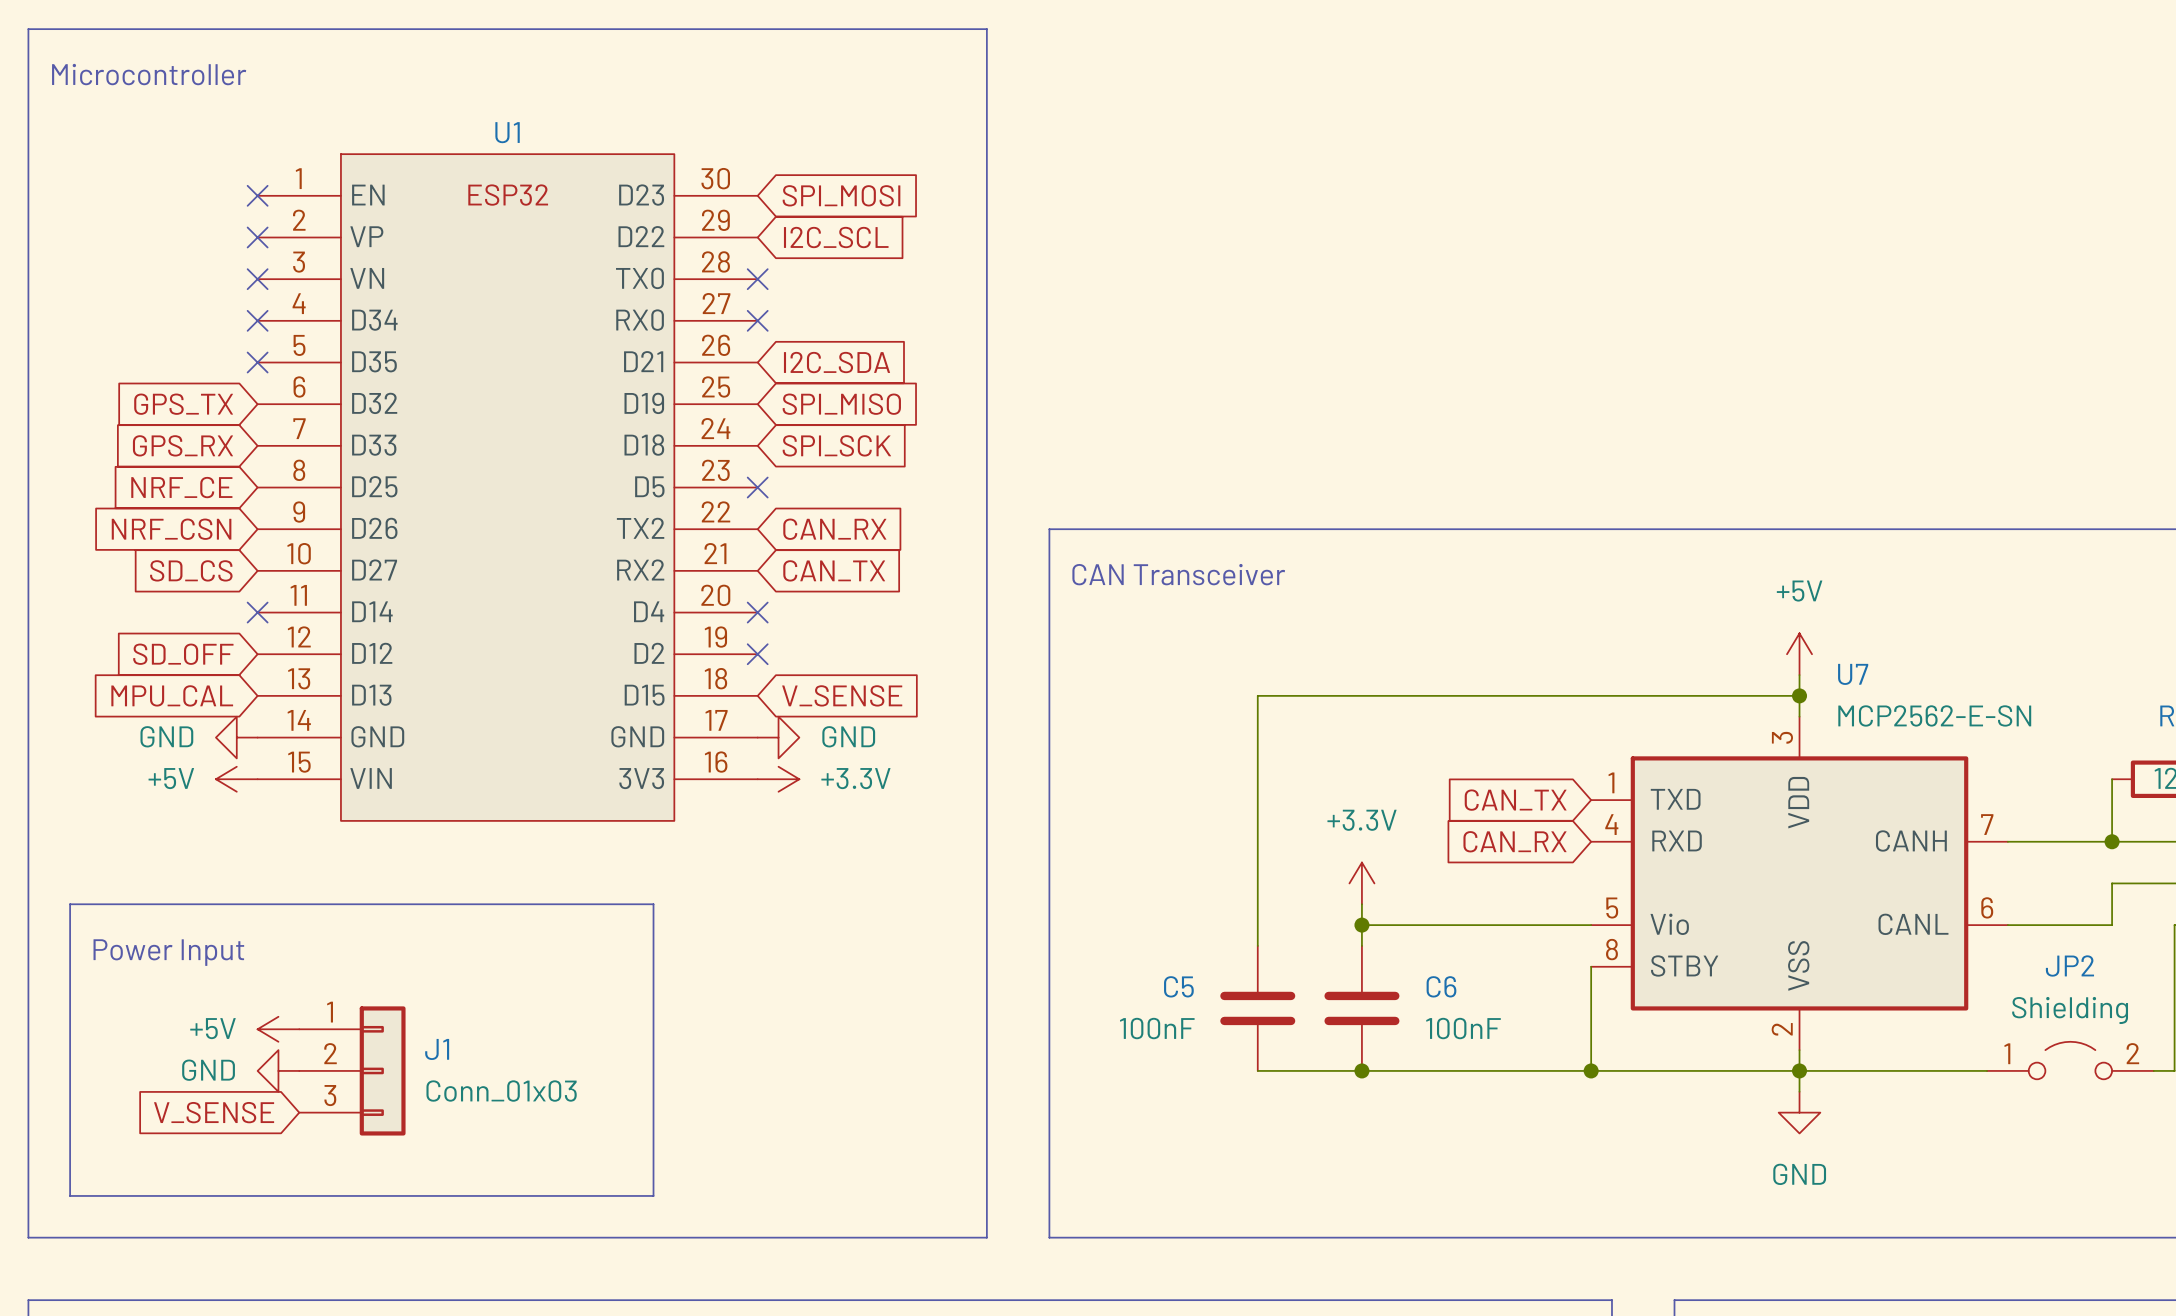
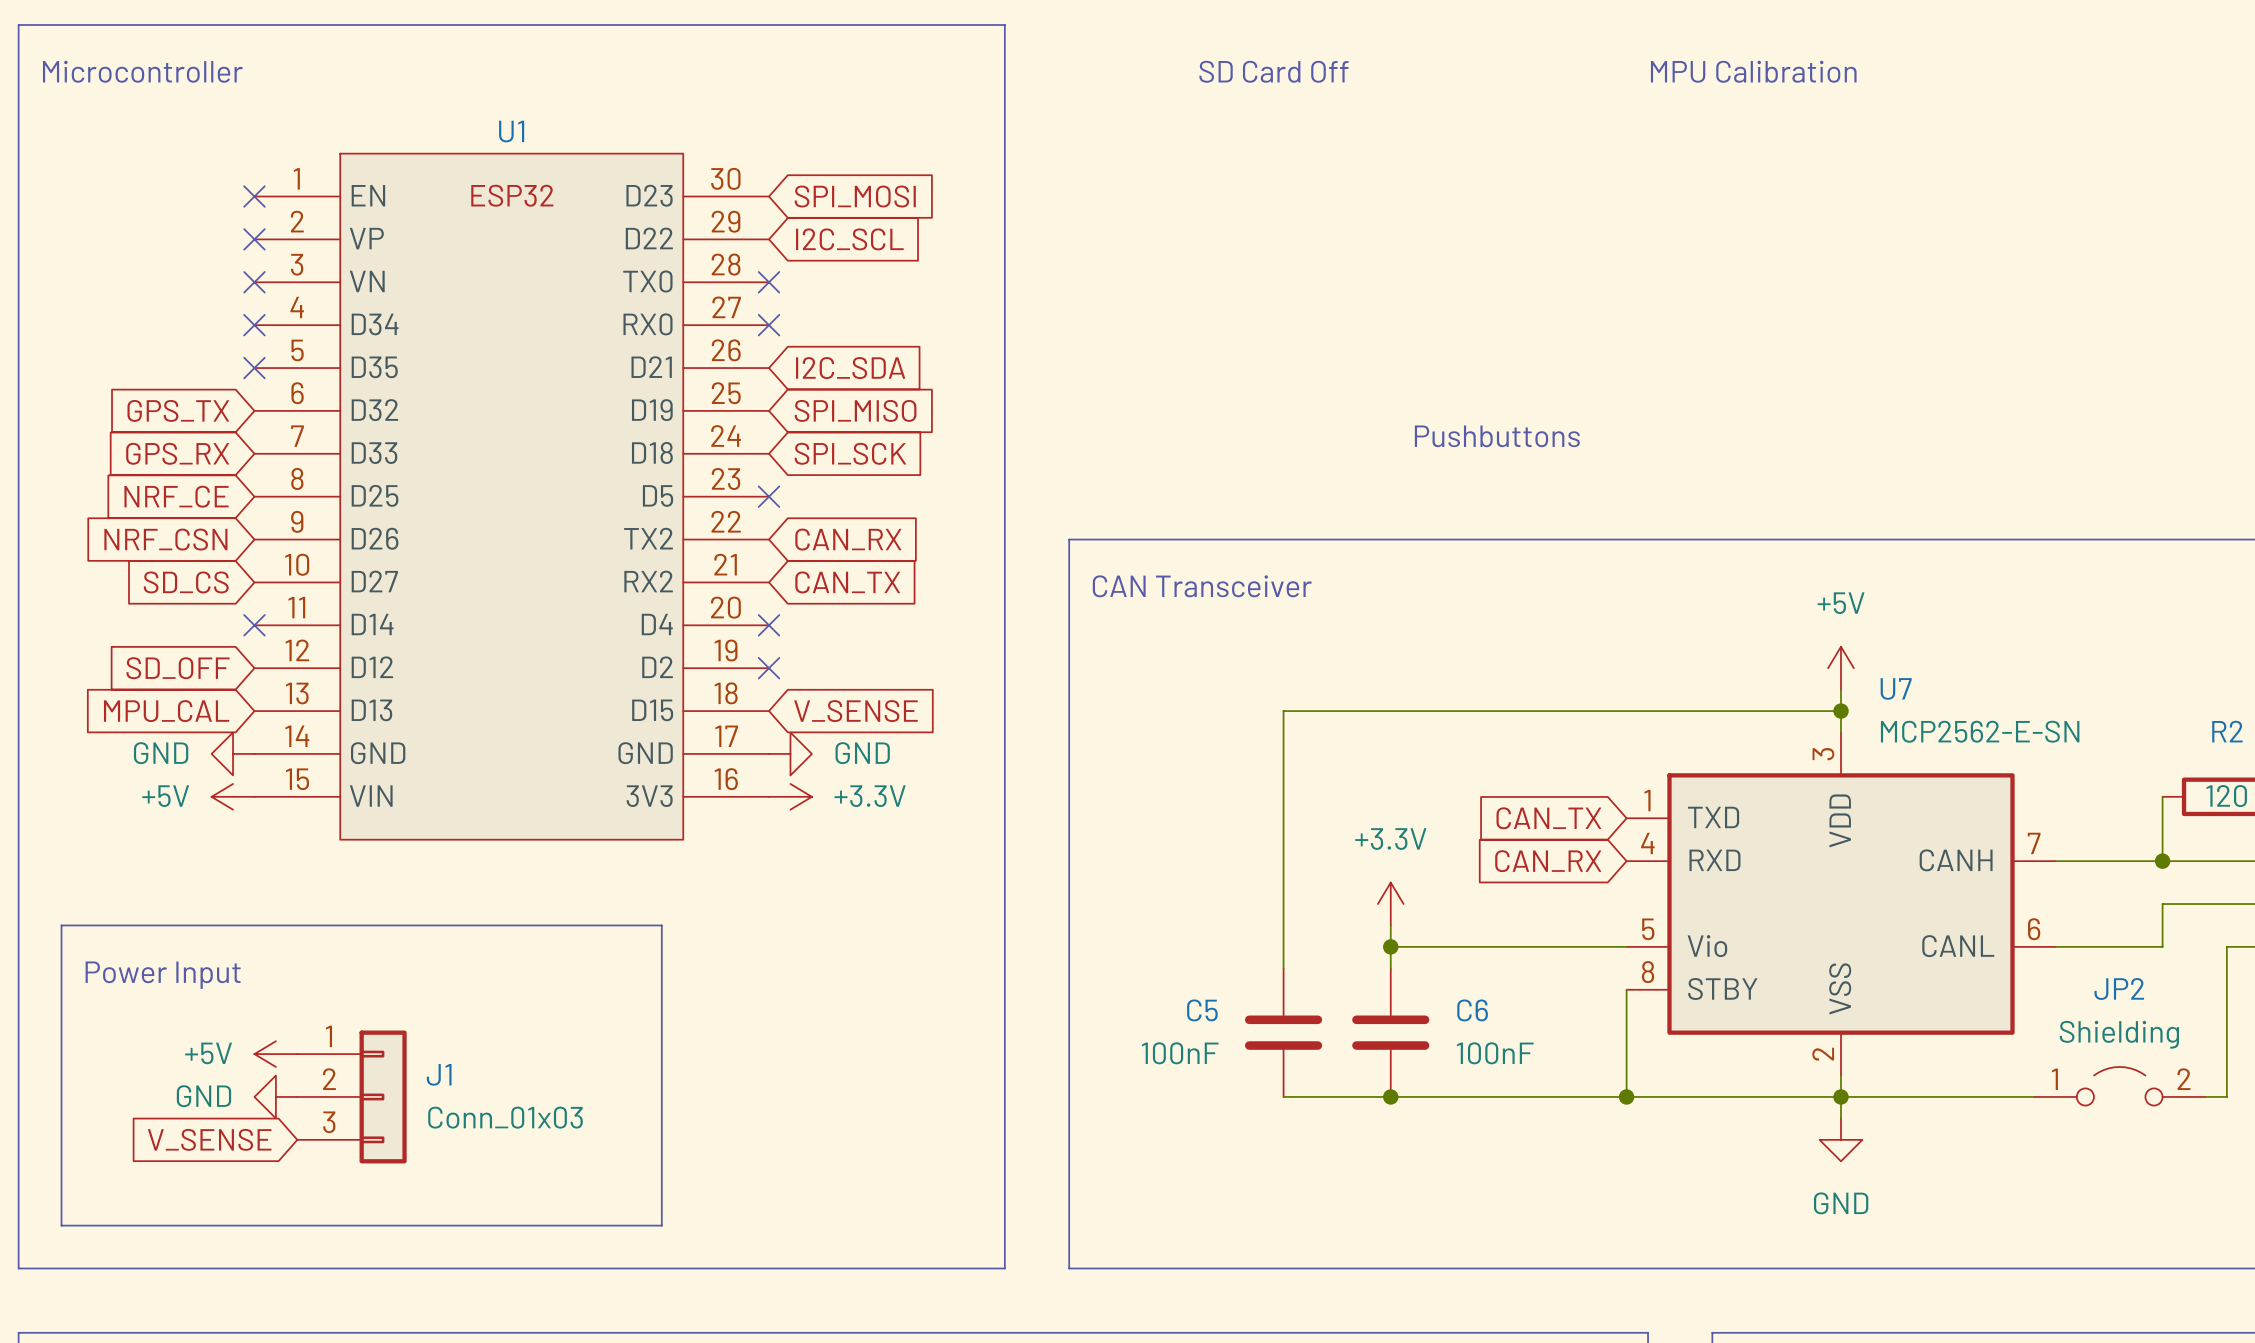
text: none -> SD Card Off (1273, 71)
text: none -> MPU Calibration (1753, 71)
text: none -> Pushbuttons (1497, 436)

